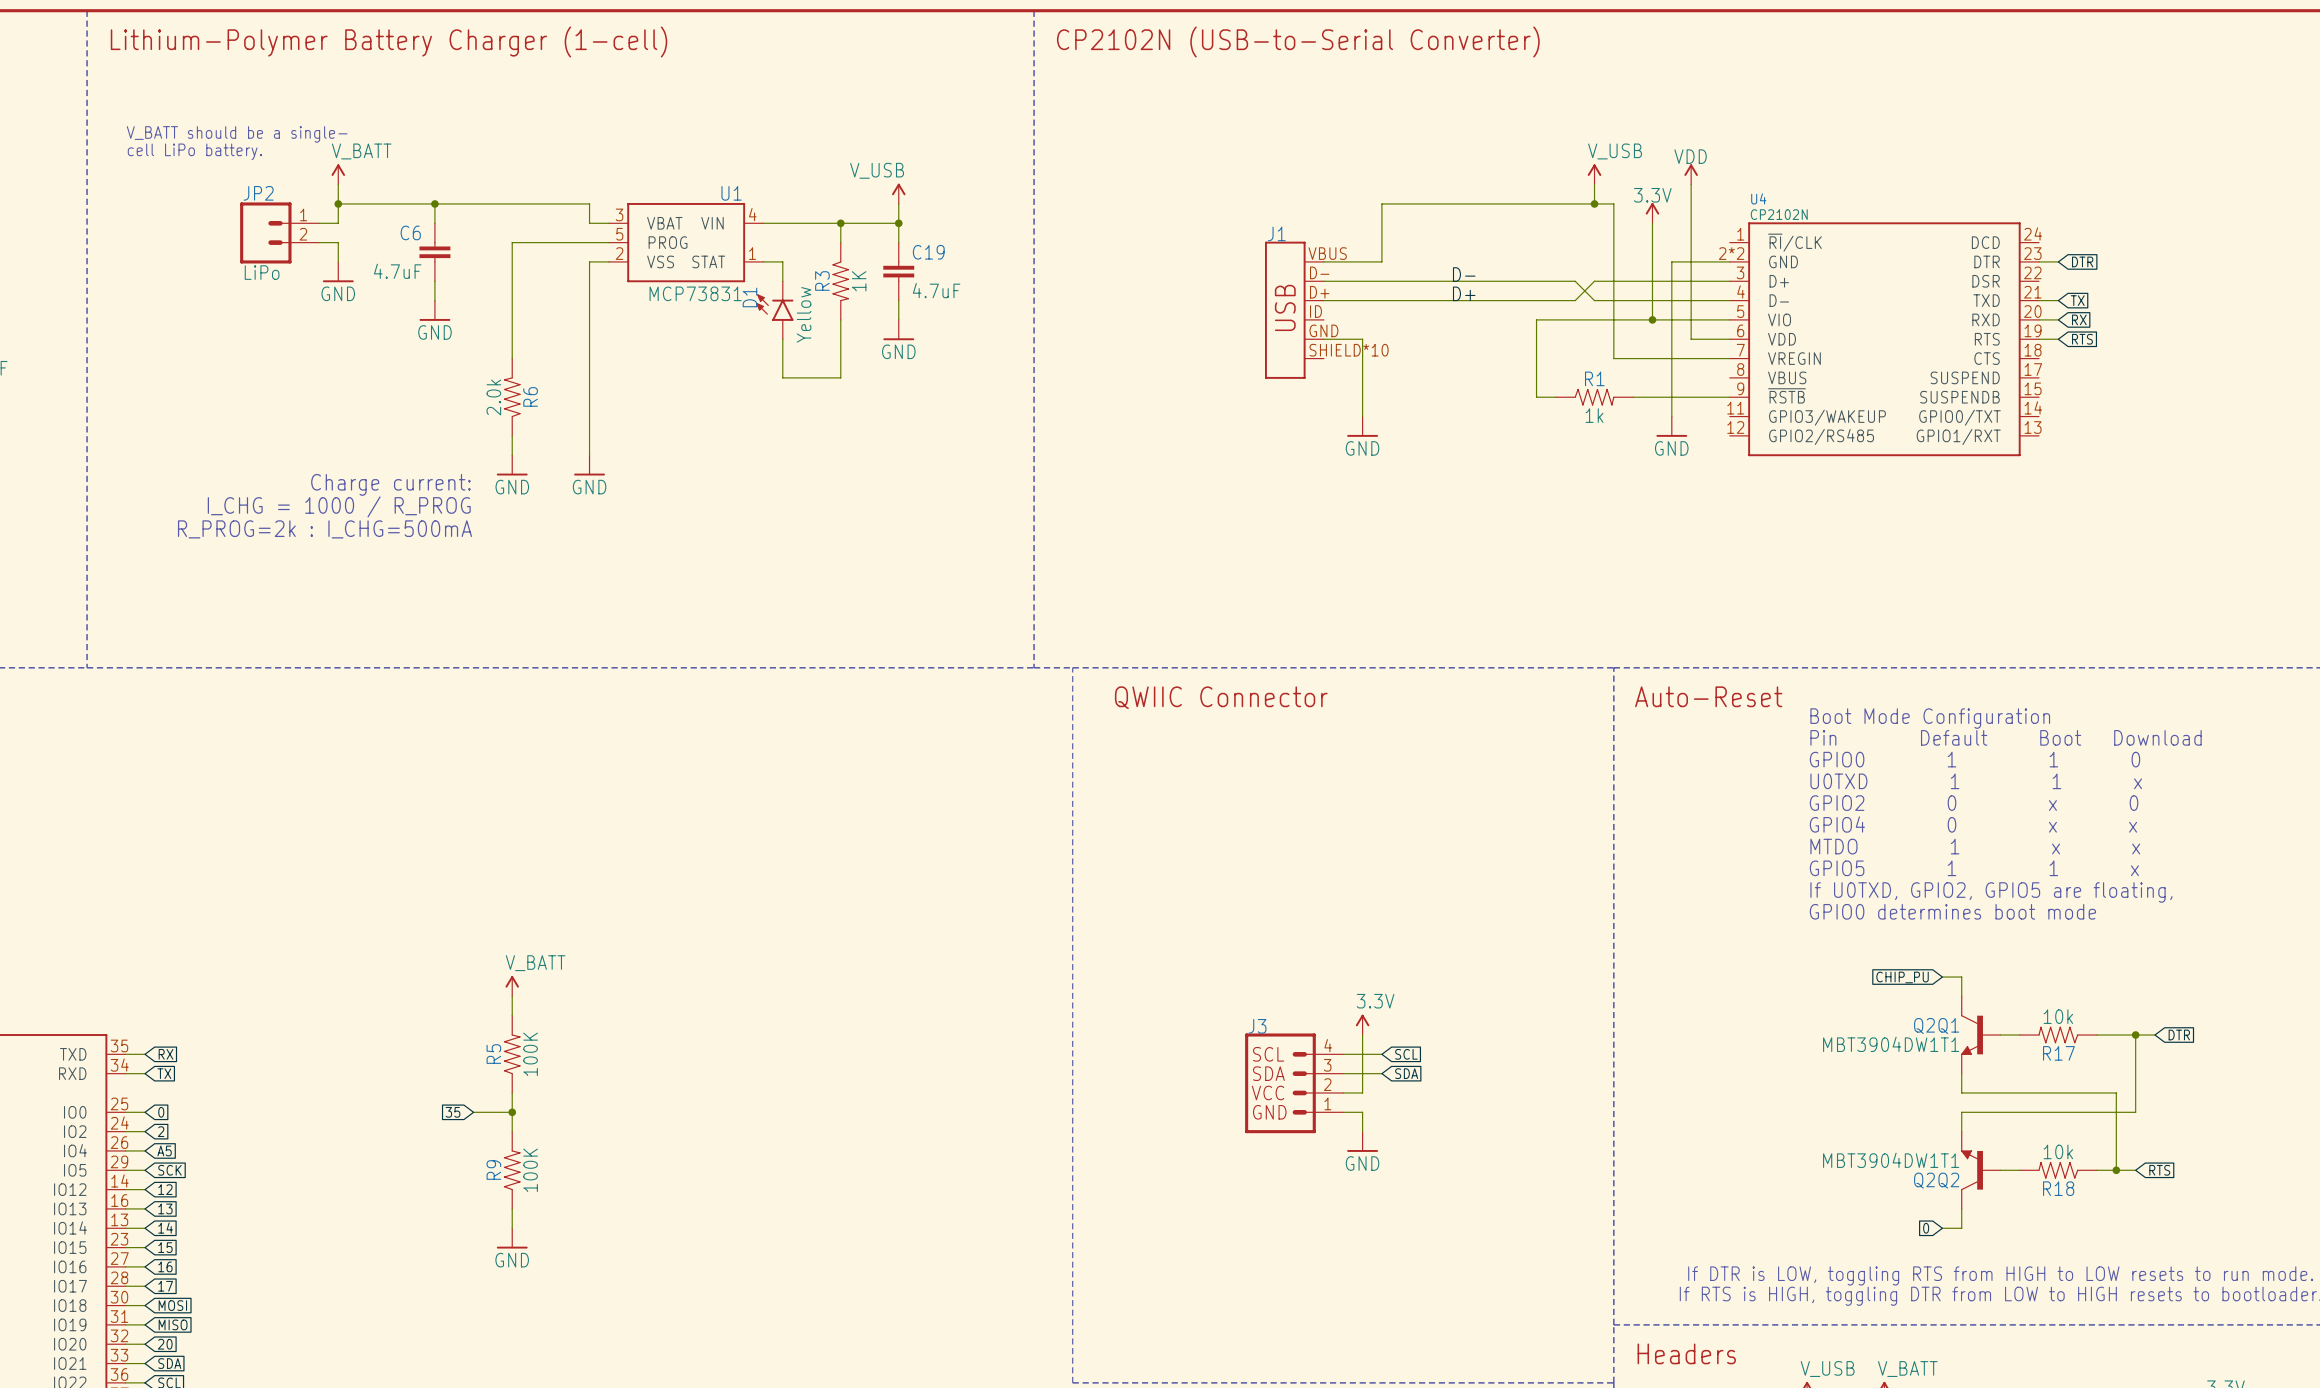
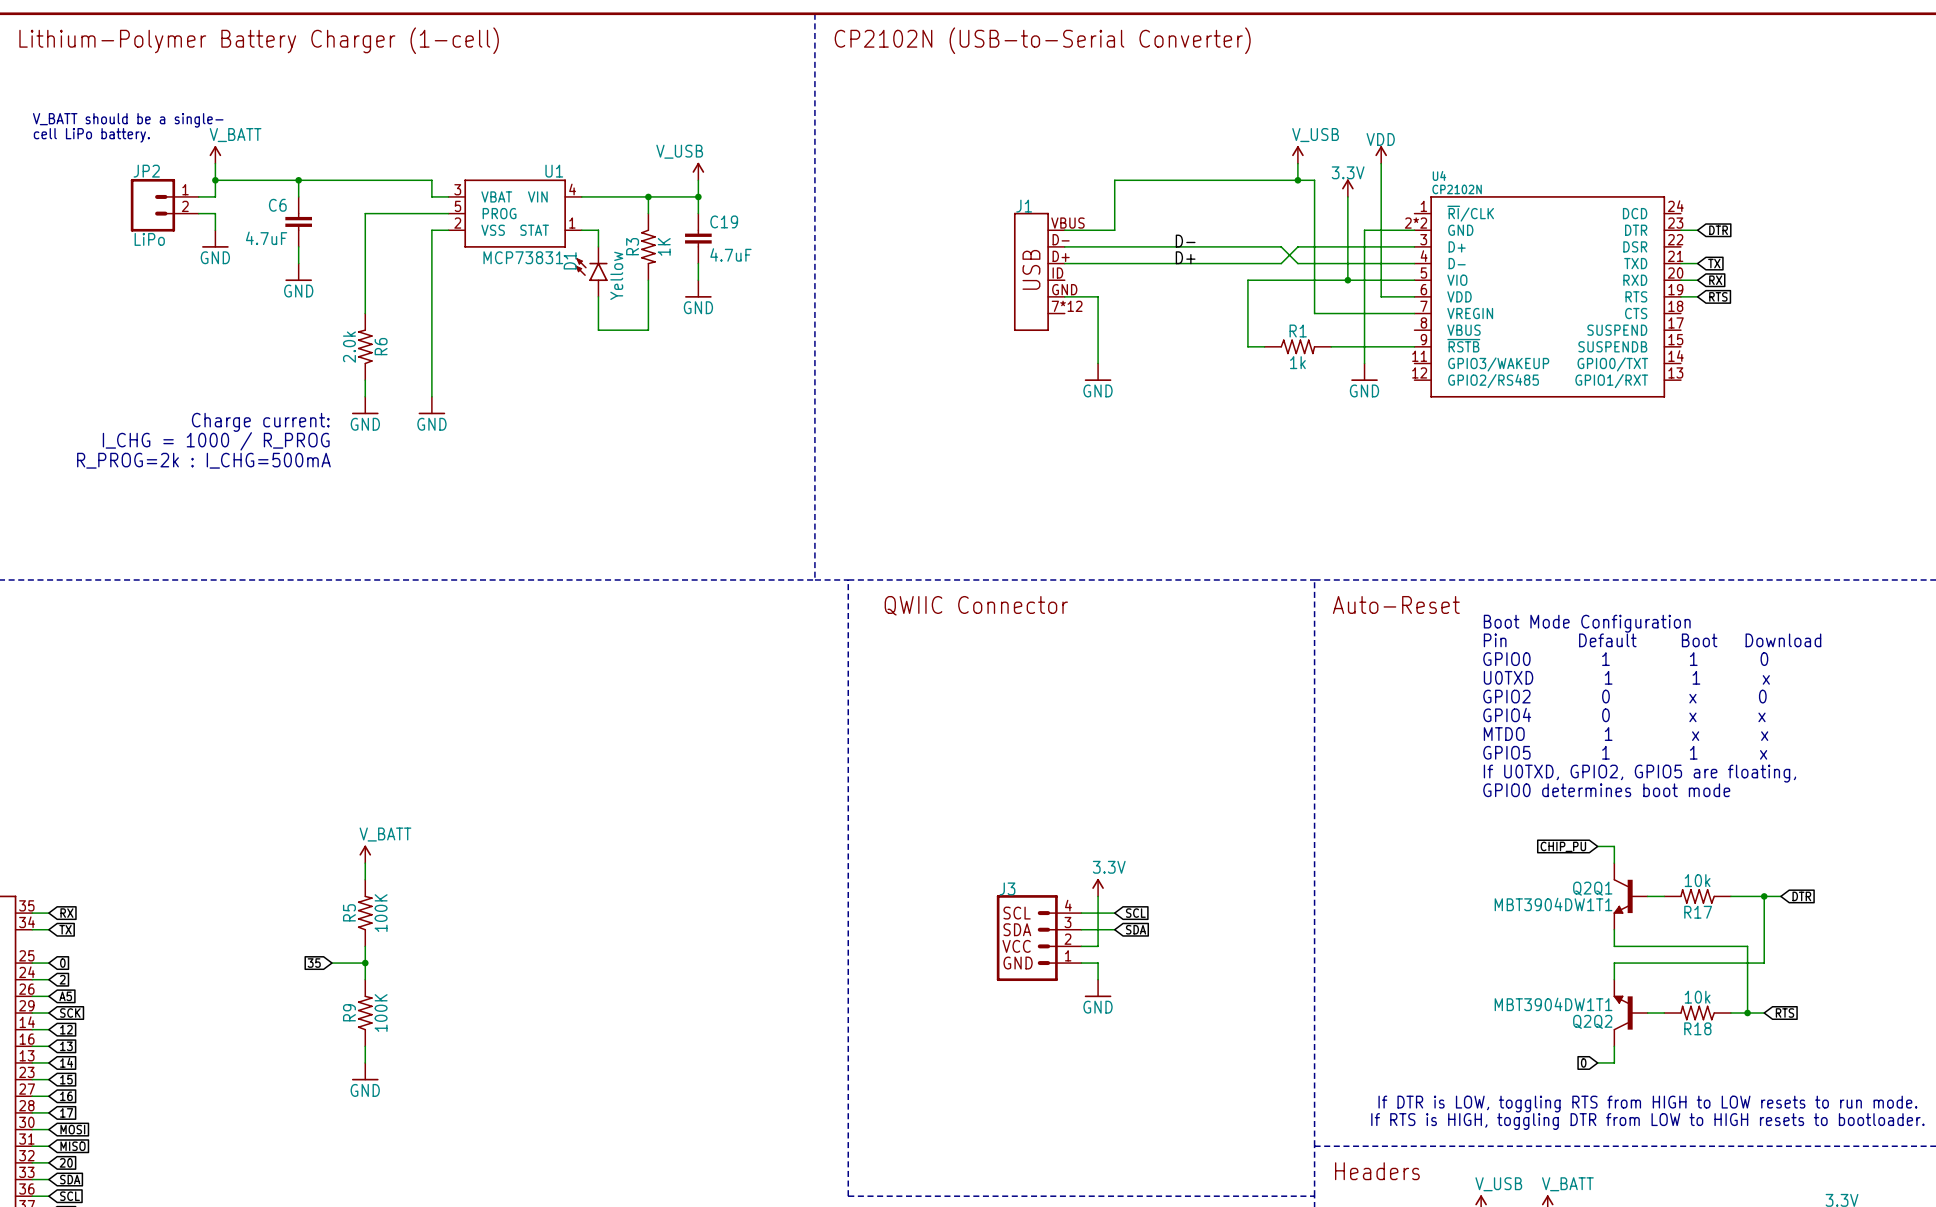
J1 pin number: SHIELD*10 (1349, 350) -> 7*12 (1067, 306)

